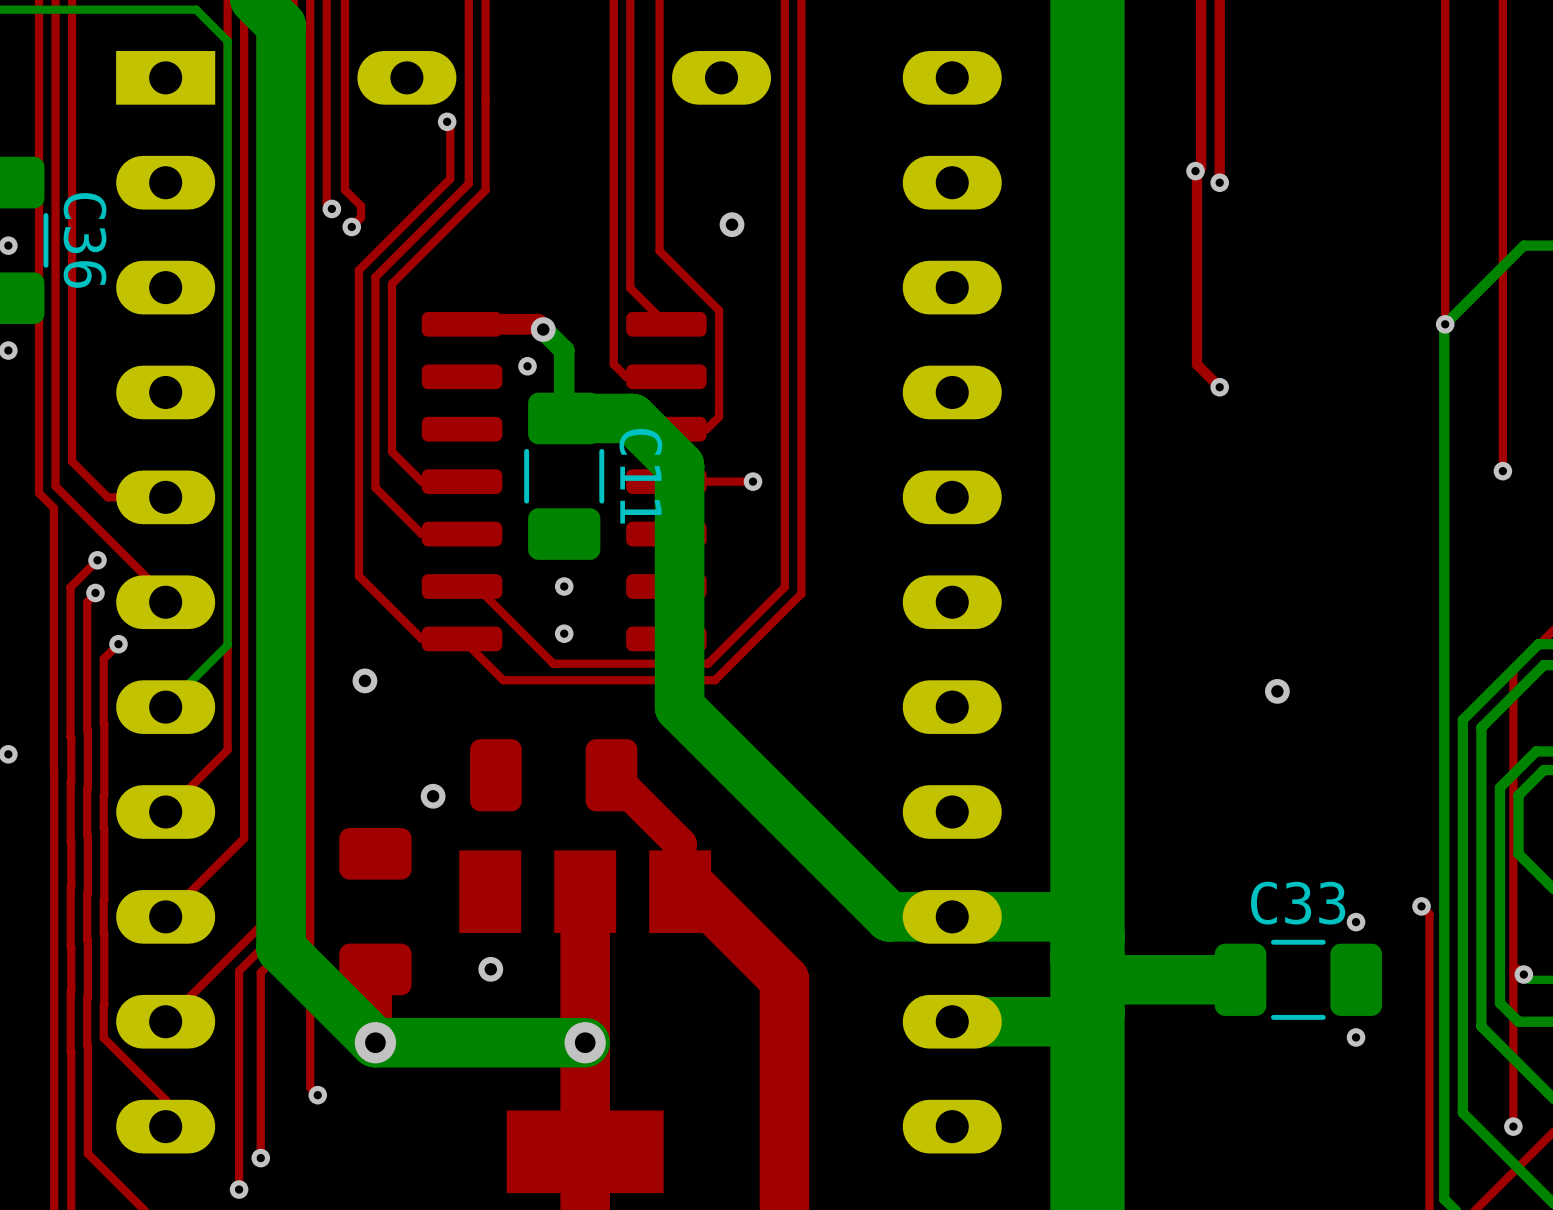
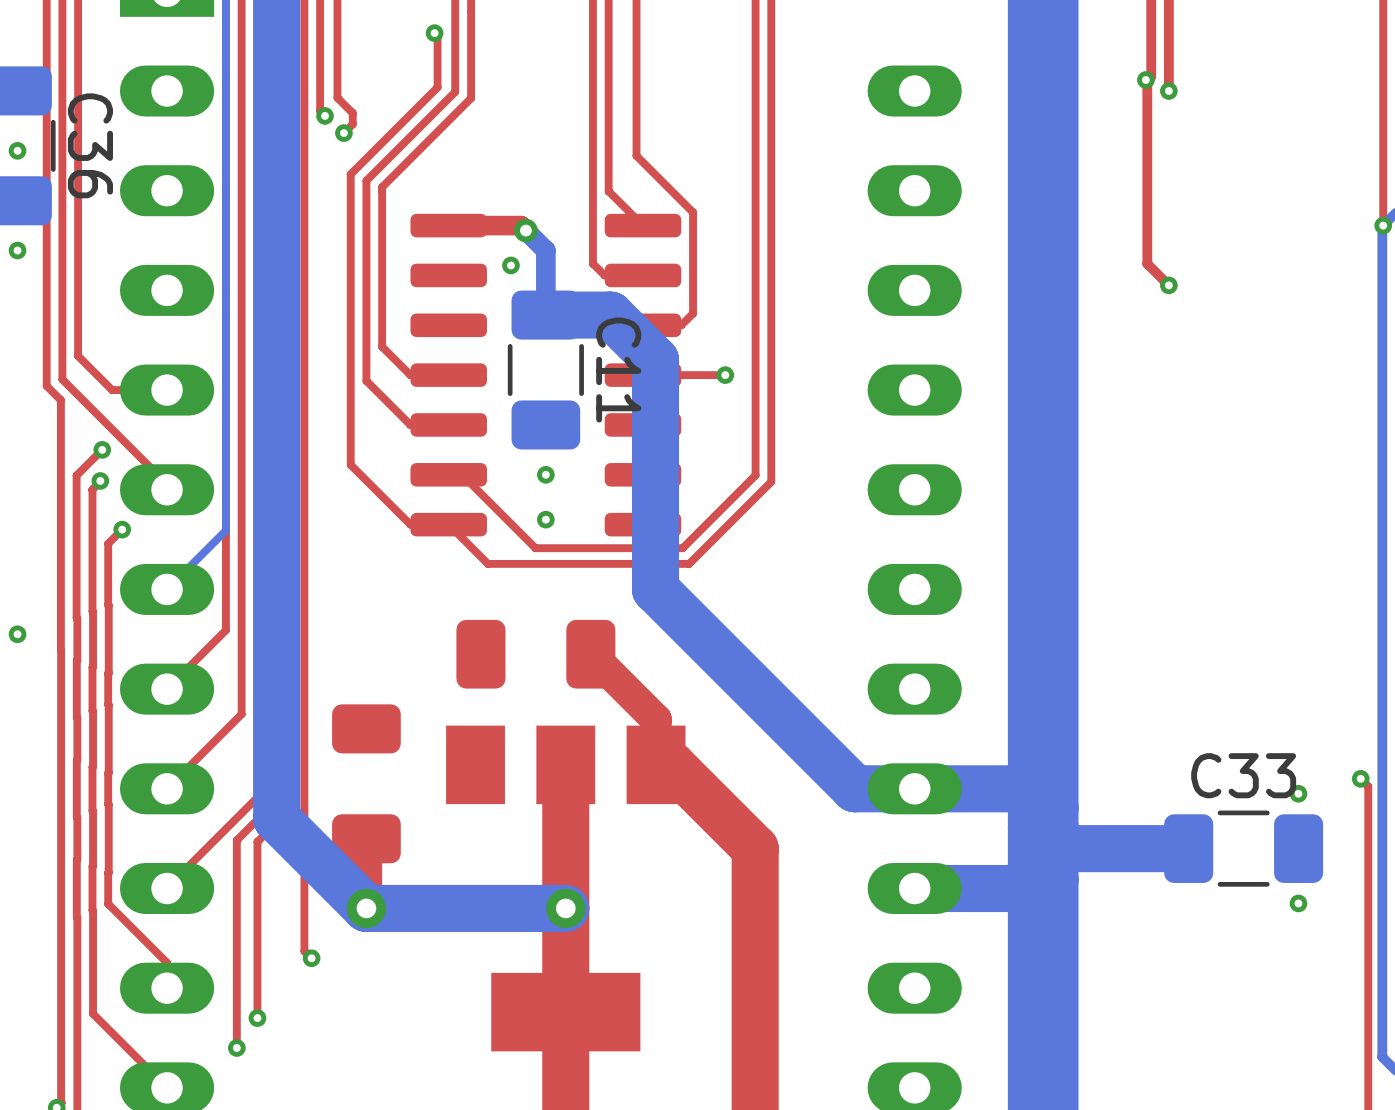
via: (732, 224) -> none
via: (364, 680) -> none
via: (1277, 691) -> none
via: (433, 796) -> none
via: (490, 969) -> none

